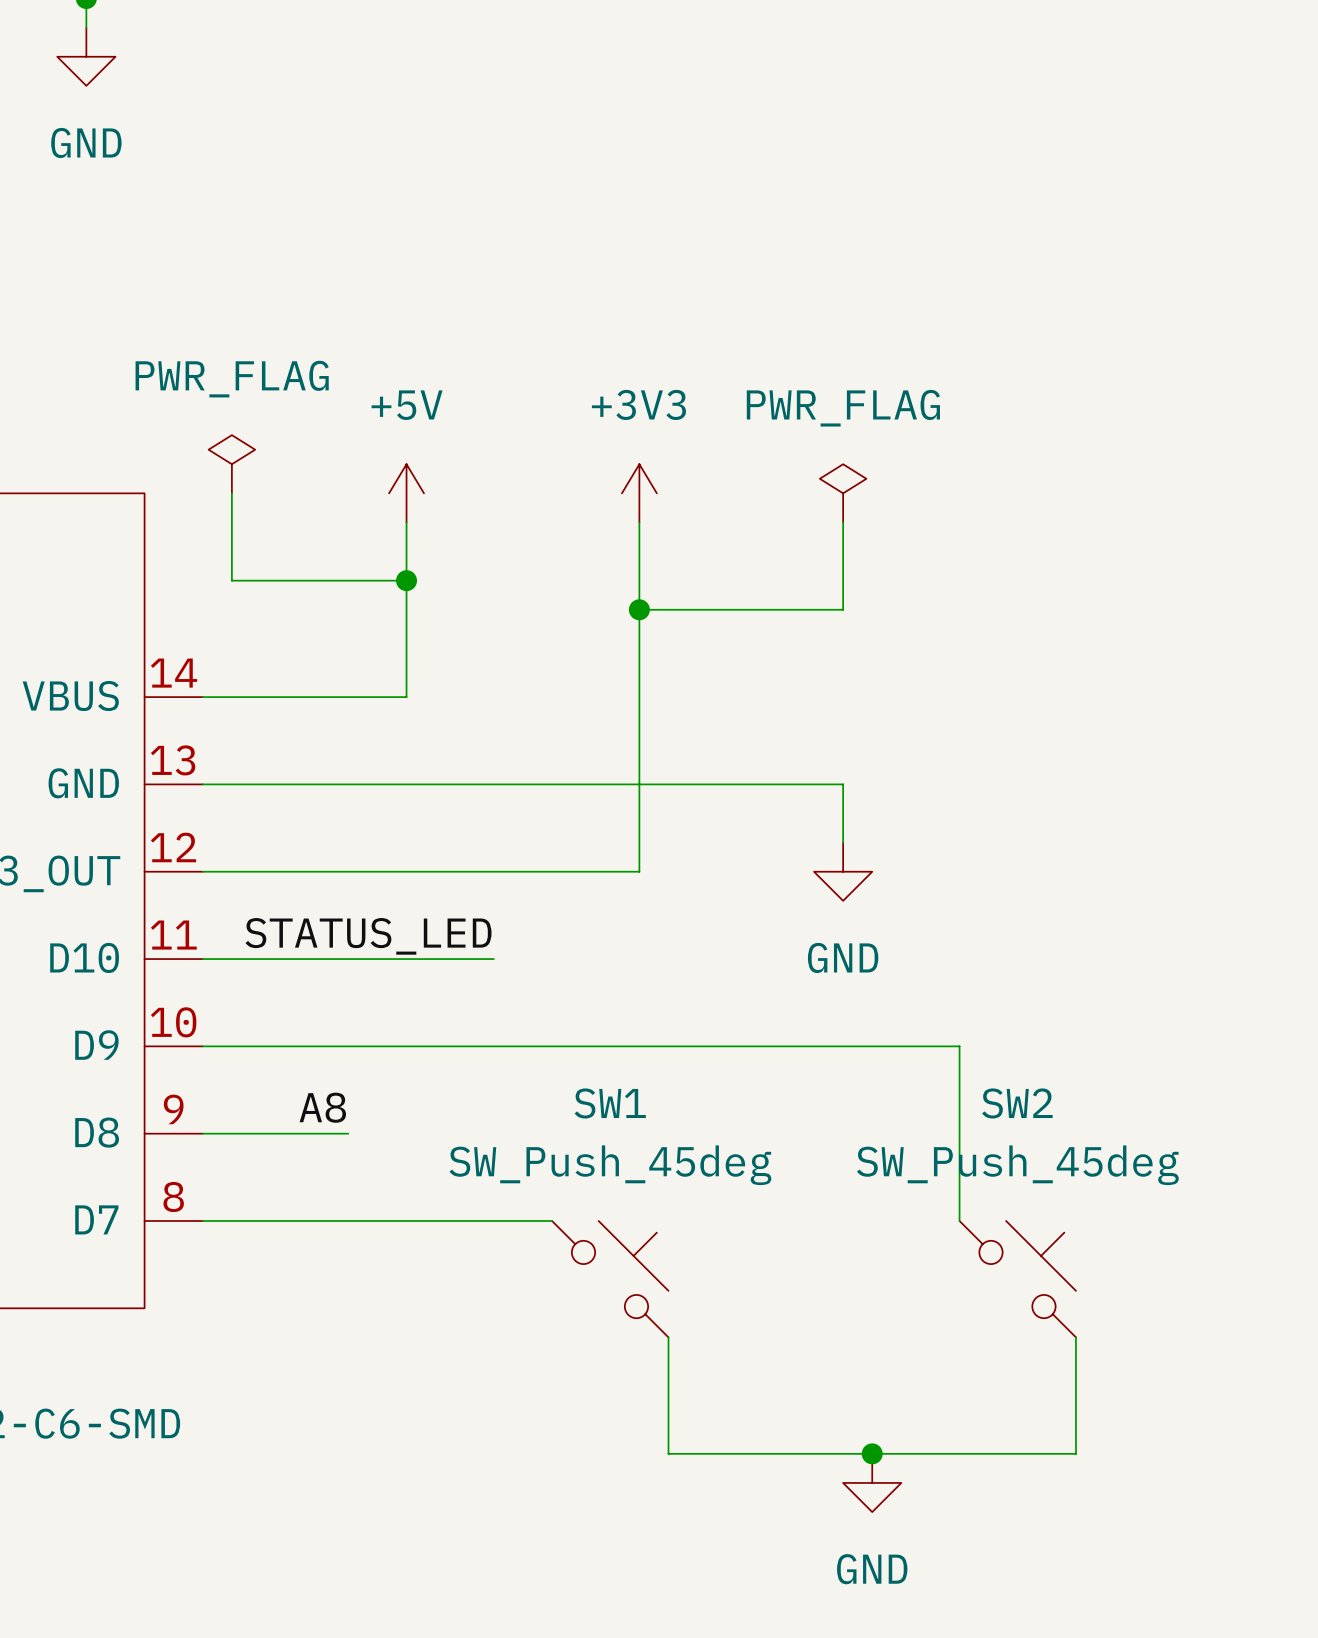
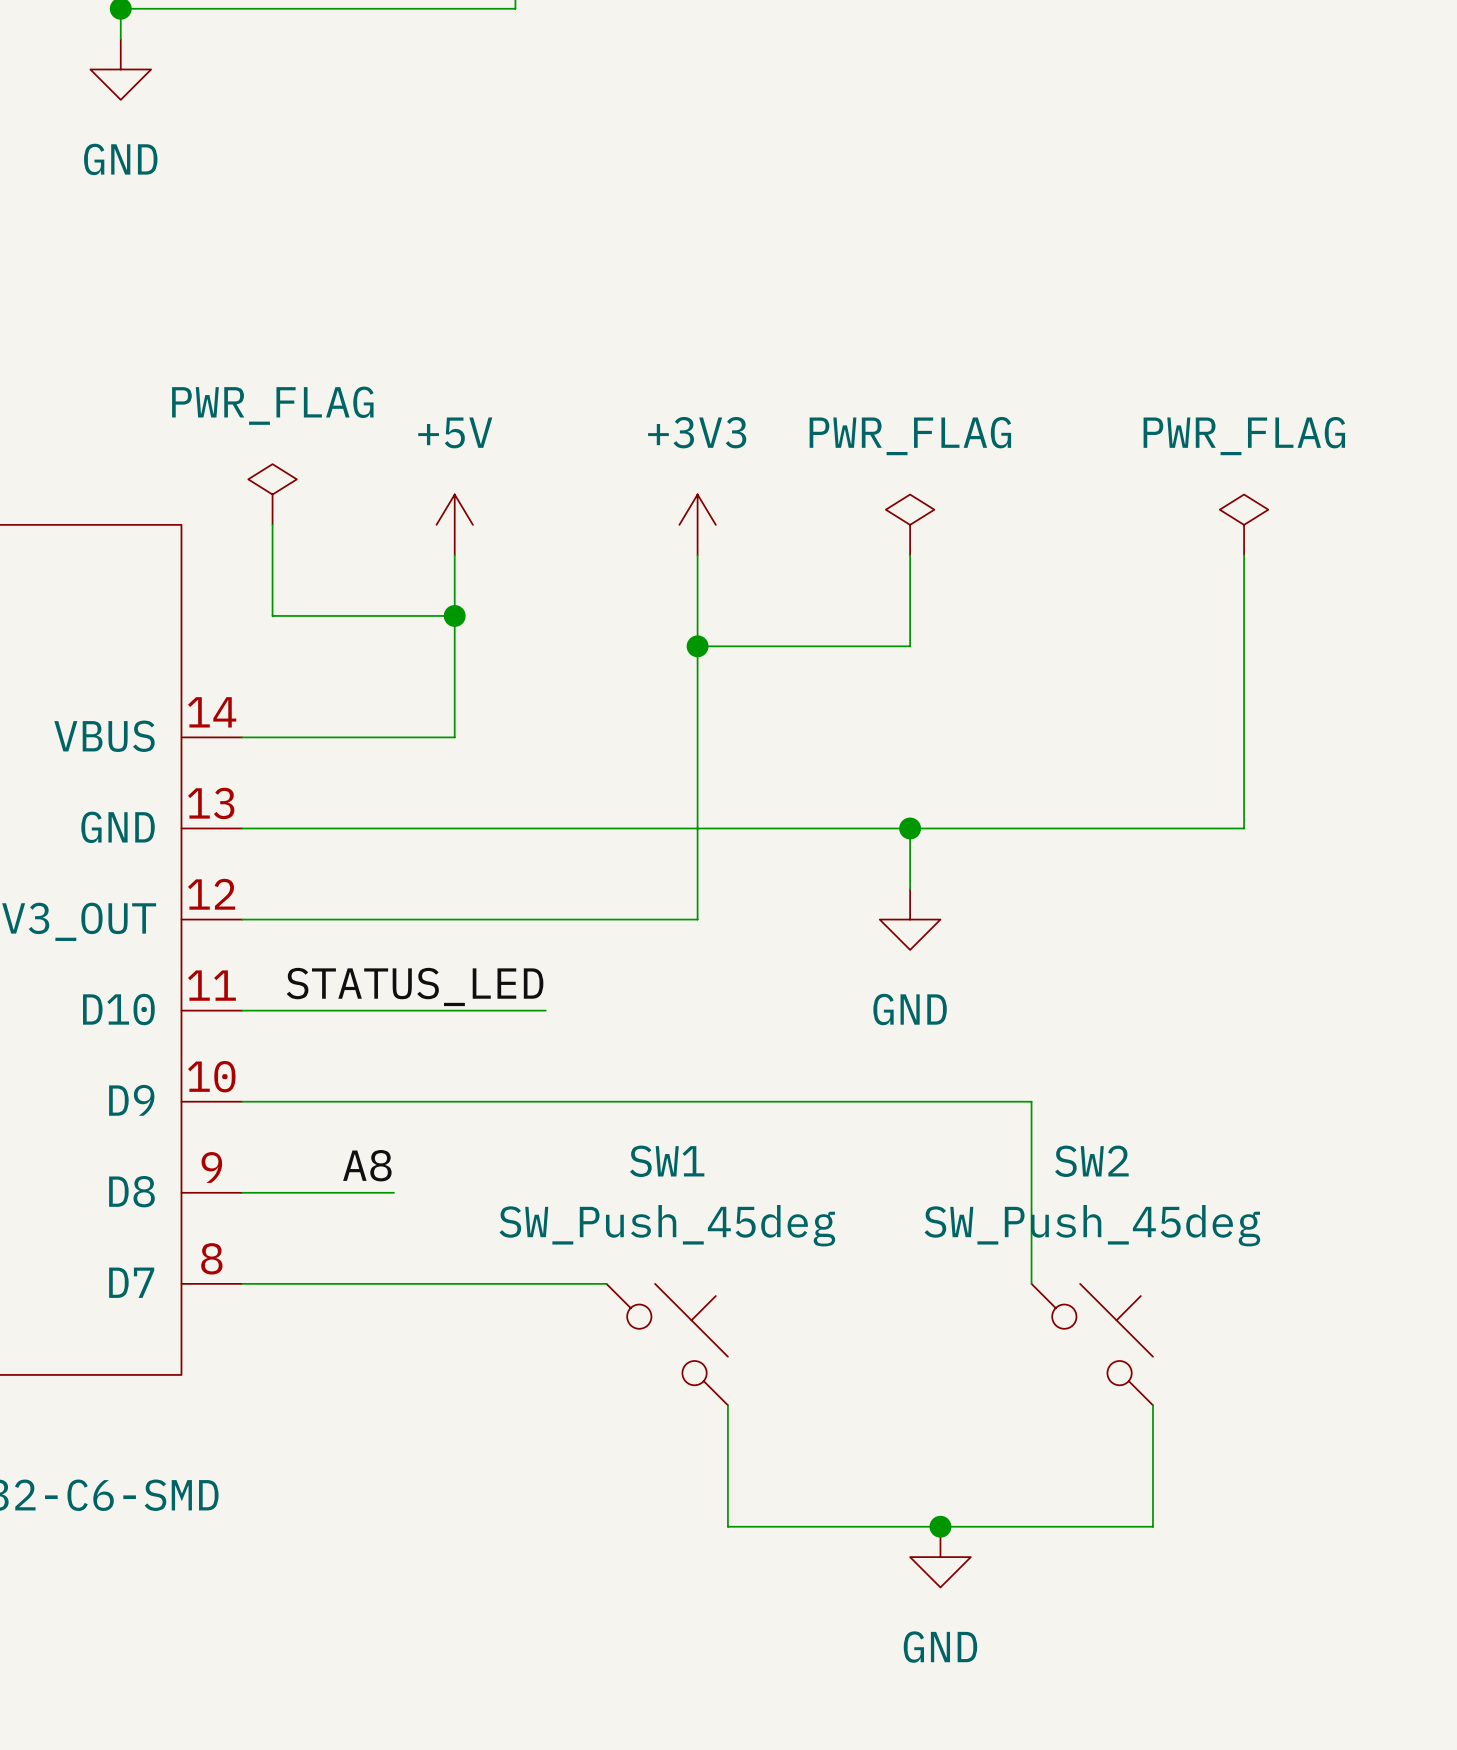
power symbol: none -> PWR_FLAG (1244, 524)
wire: none -> (1244, 555) (1244, 828) (910, 828)
junction: none -> (910, 828)

